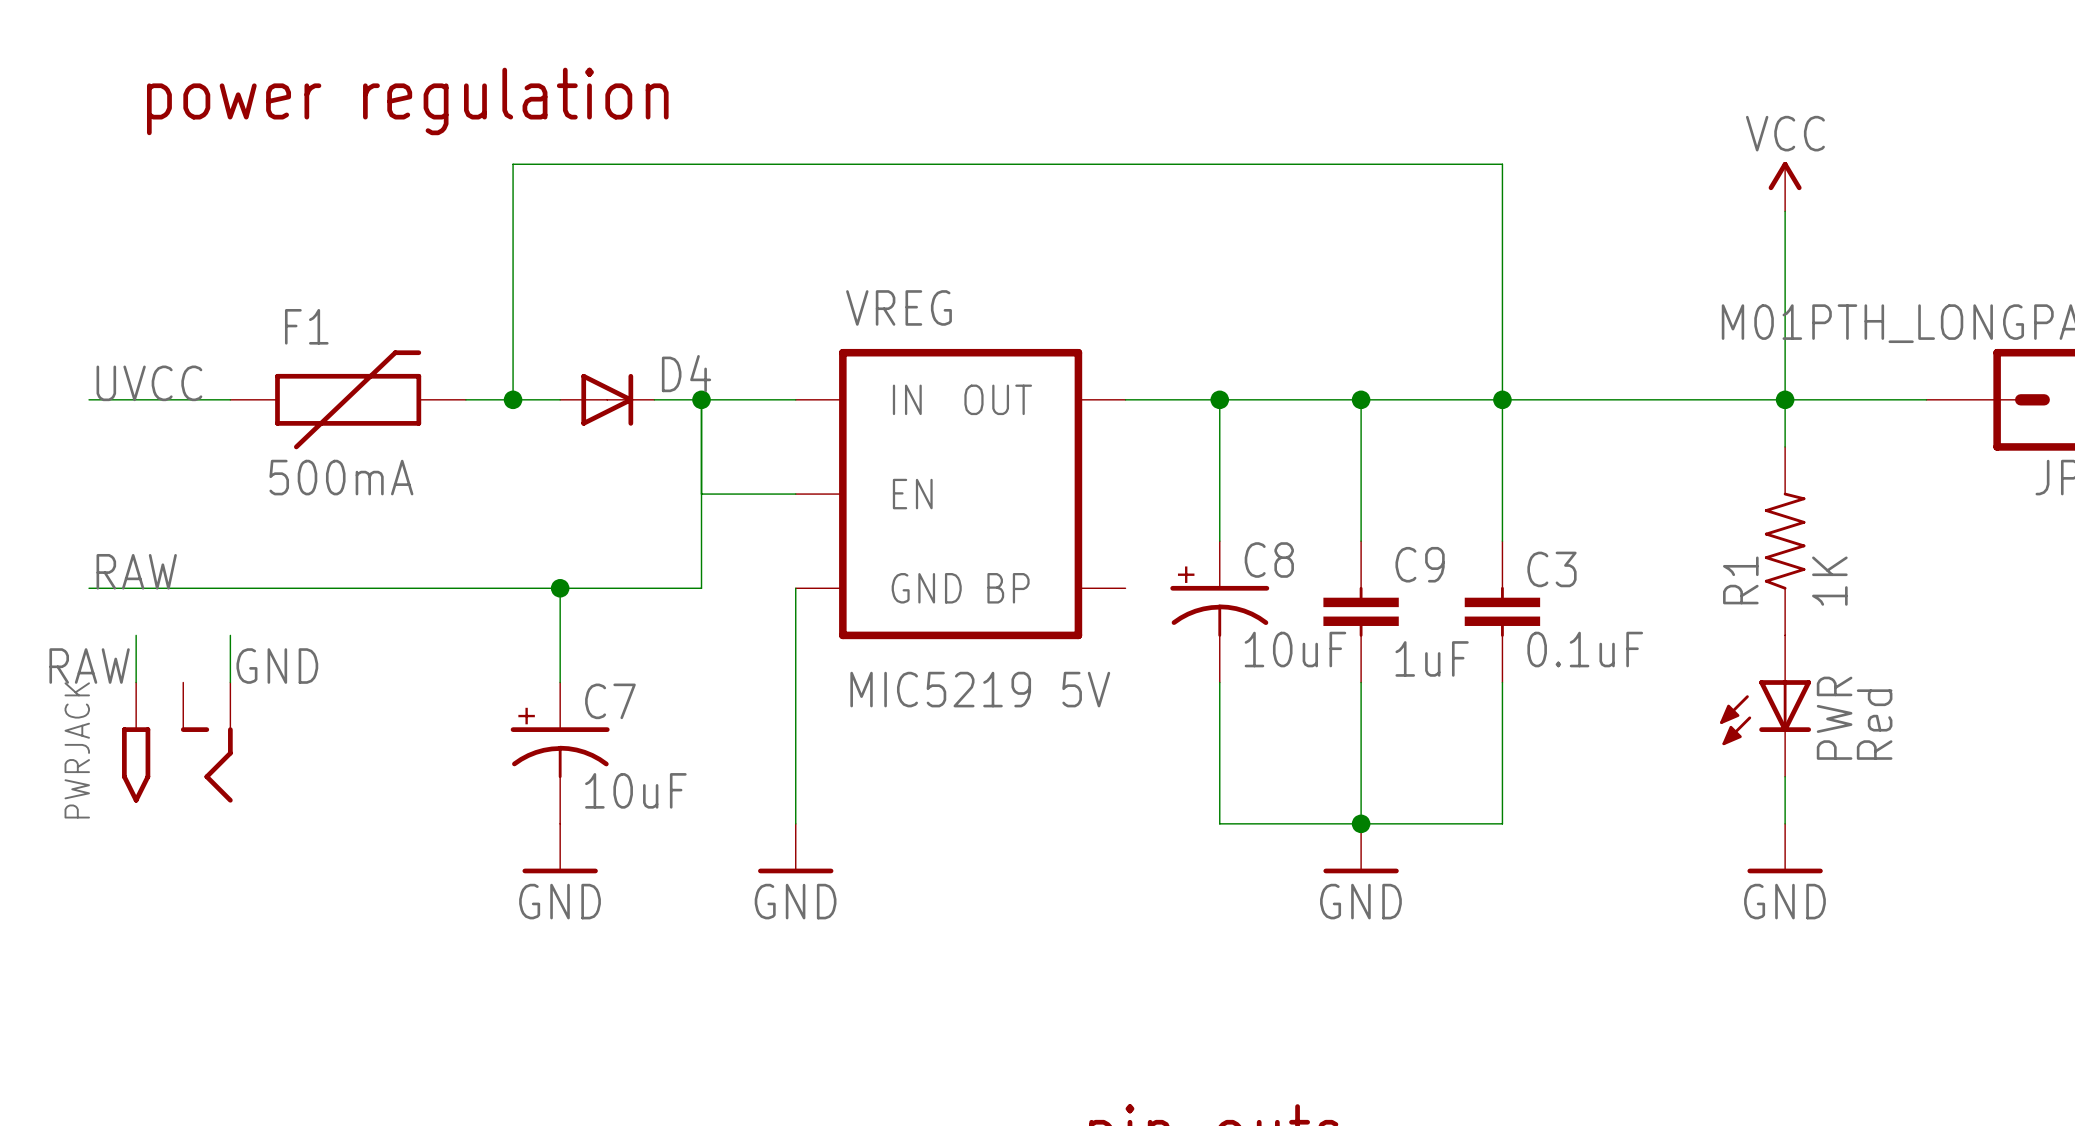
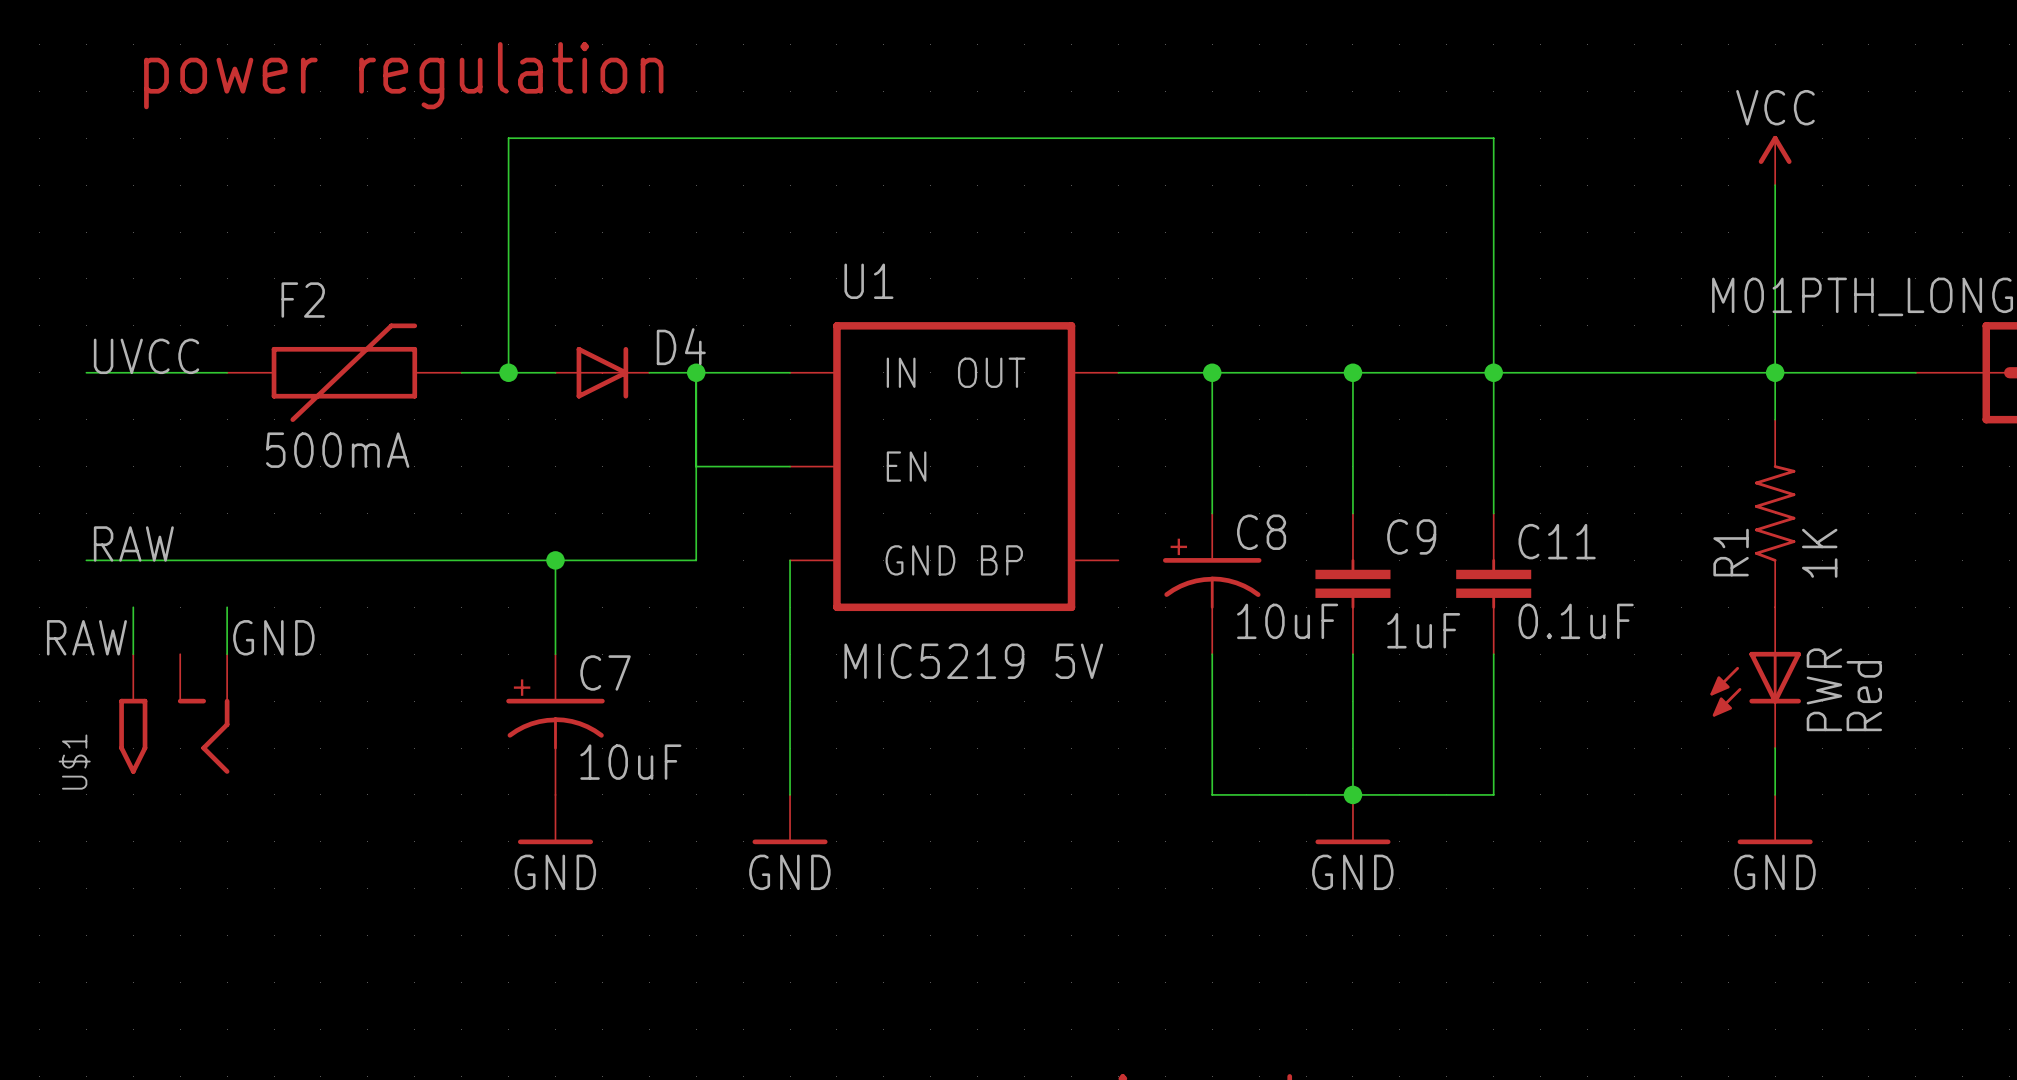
VREG name: VREG (899, 307) -> U1 (868, 281)
F1 name: F1 (306, 326) -> F2 (303, 300)
C3 name: C3 (1551, 569) -> C11 (1557, 541)
PWRJACK name: PWRJACK (77, 750) -> U$1 (74, 762)

